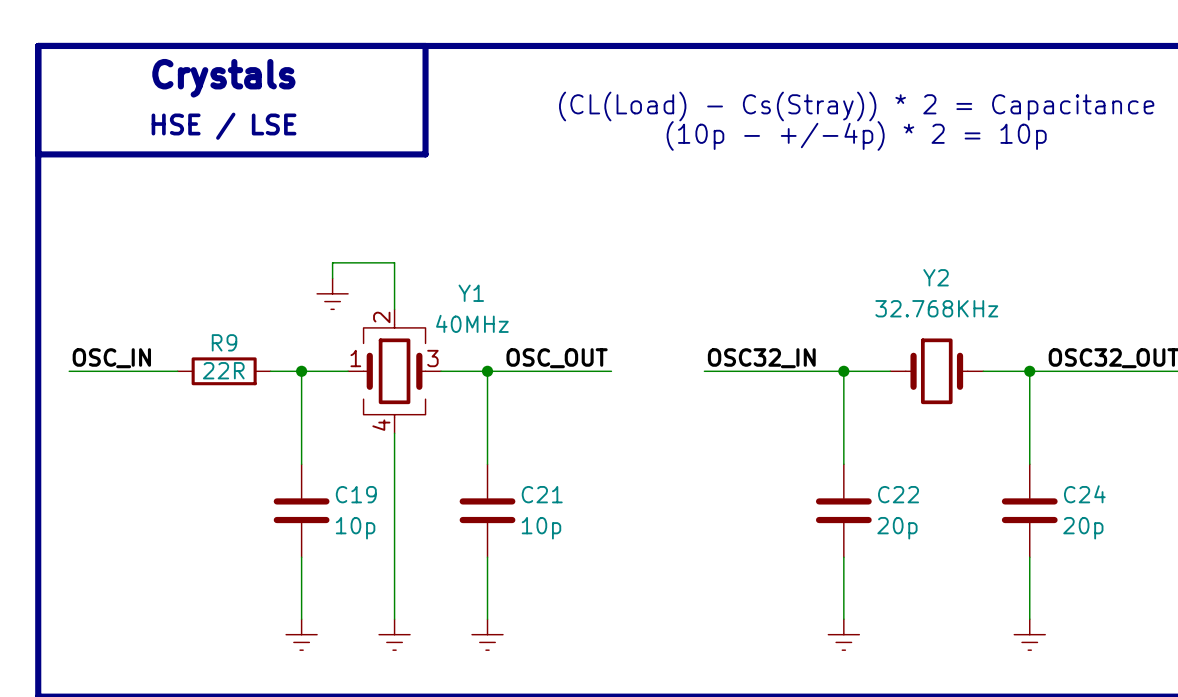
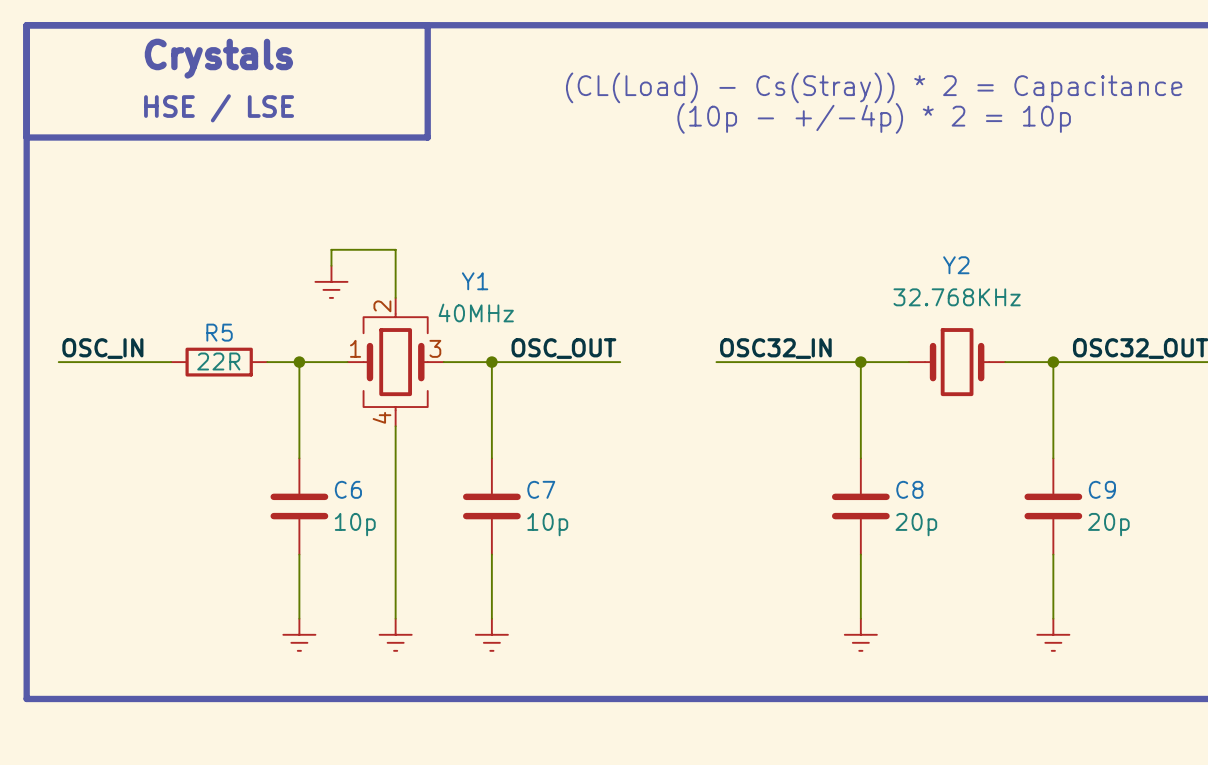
R9 name: R9 (224, 342) -> R5 (219, 332)
C19 name: C19 (356, 494) -> C6 (348, 489)
C21 name: C21 (542, 494) -> C7 (541, 489)
C22 name: C22 (898, 494) -> C8 (909, 489)
C24 name: C24 (1084, 494) -> C9 (1102, 489)

